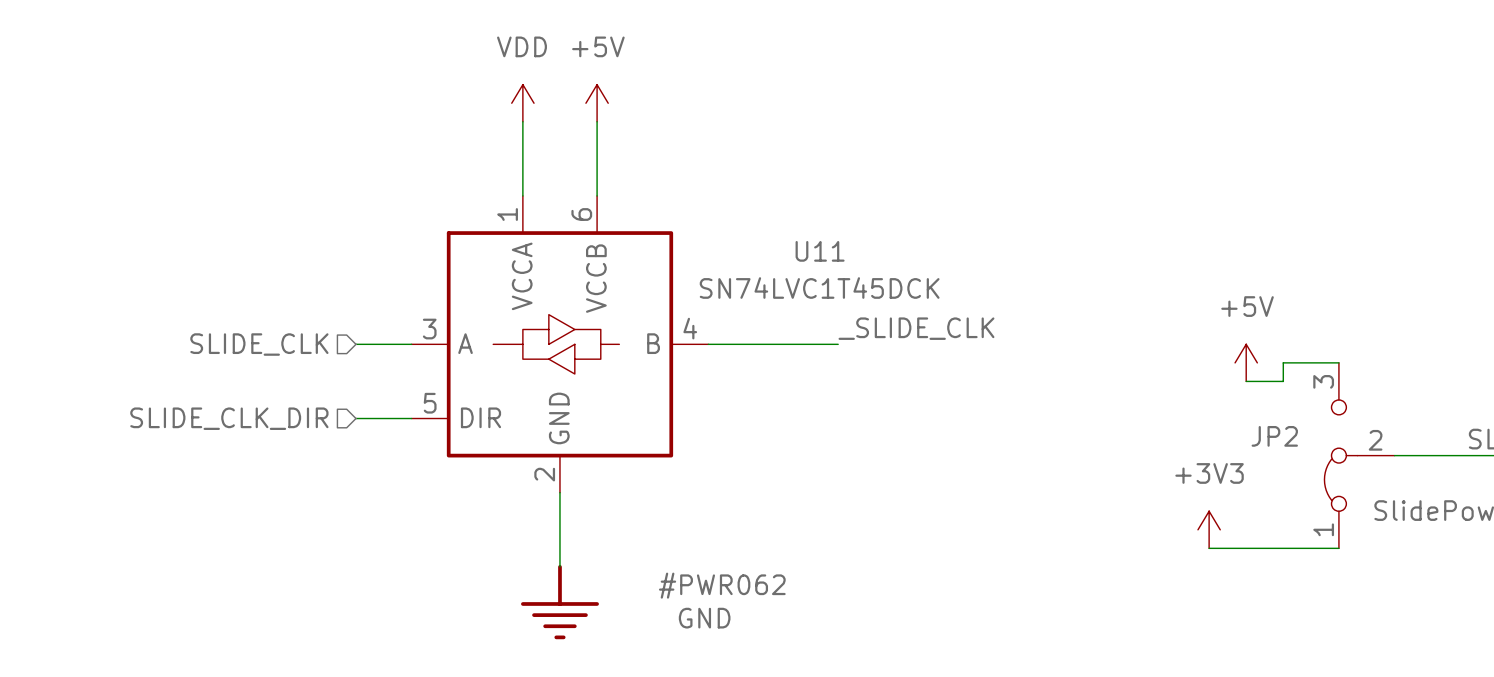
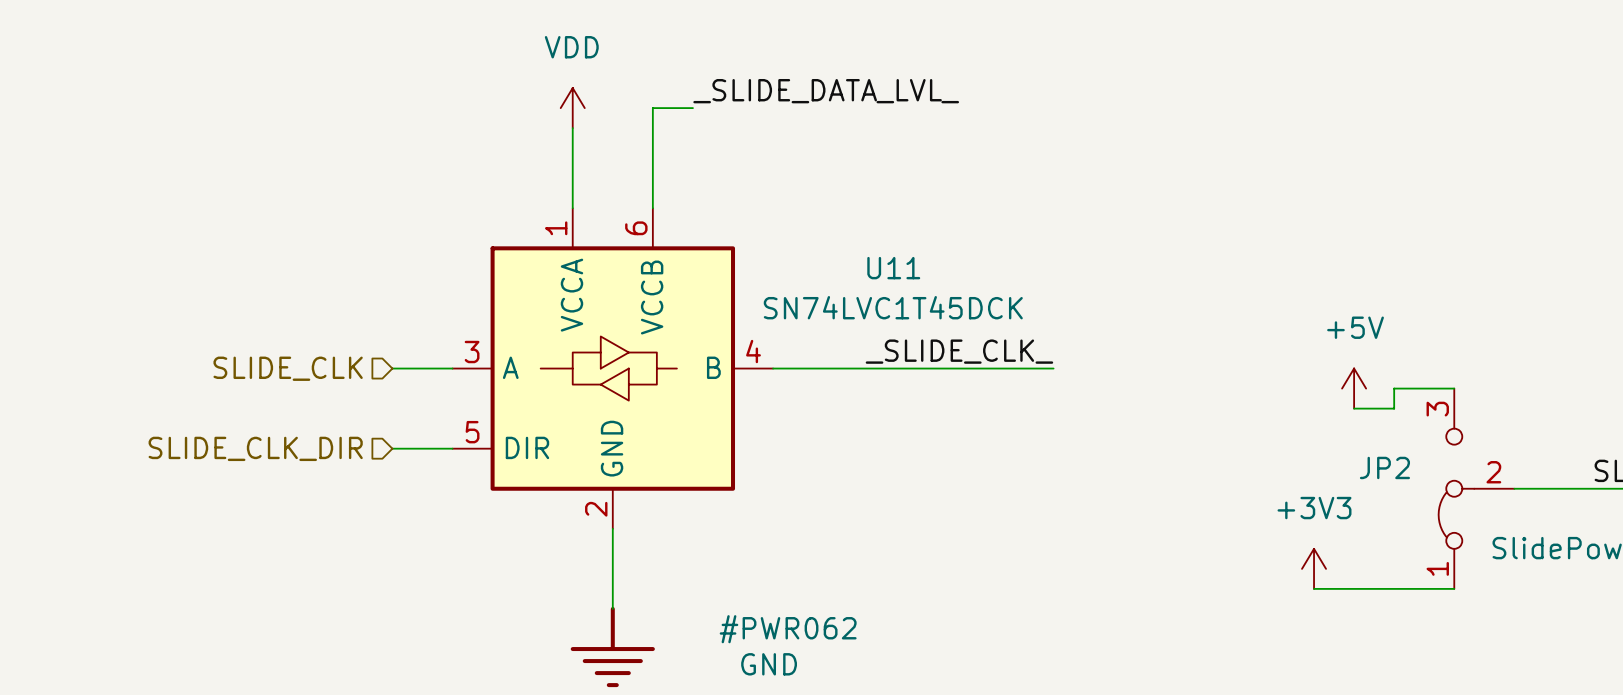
label: none -> _SLIDE_DATA_LVL_ (826, 91)
power symbol: +5V (597, 103) -> none
wire: none -> (692, 108) (652, 108) (652, 128)
label: _SLIDE_CLK (916, 328) -> _SLIDE_CLK_ (959, 351)
wire: none -> (913, 368) (1053, 368)

